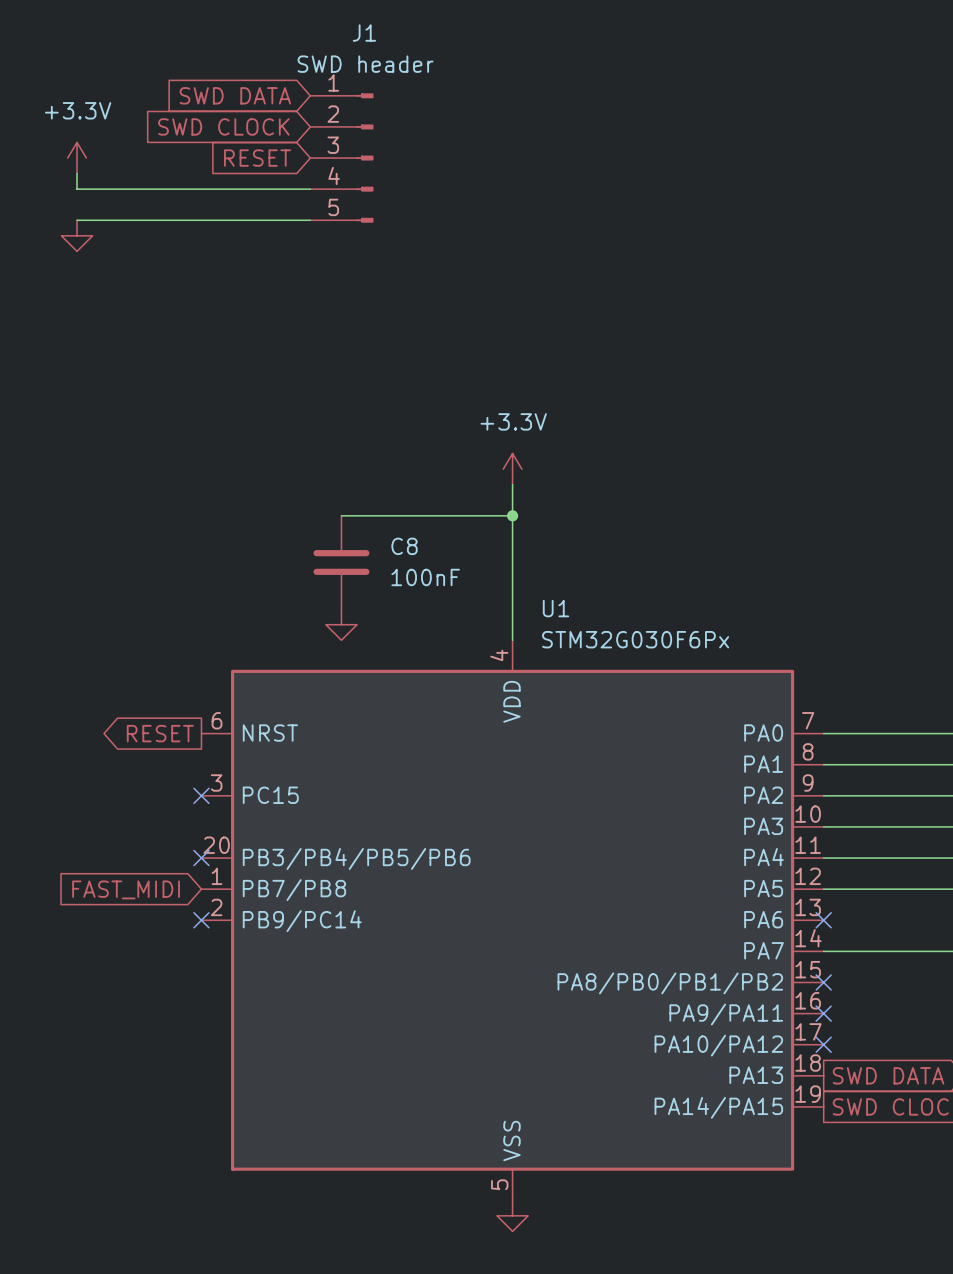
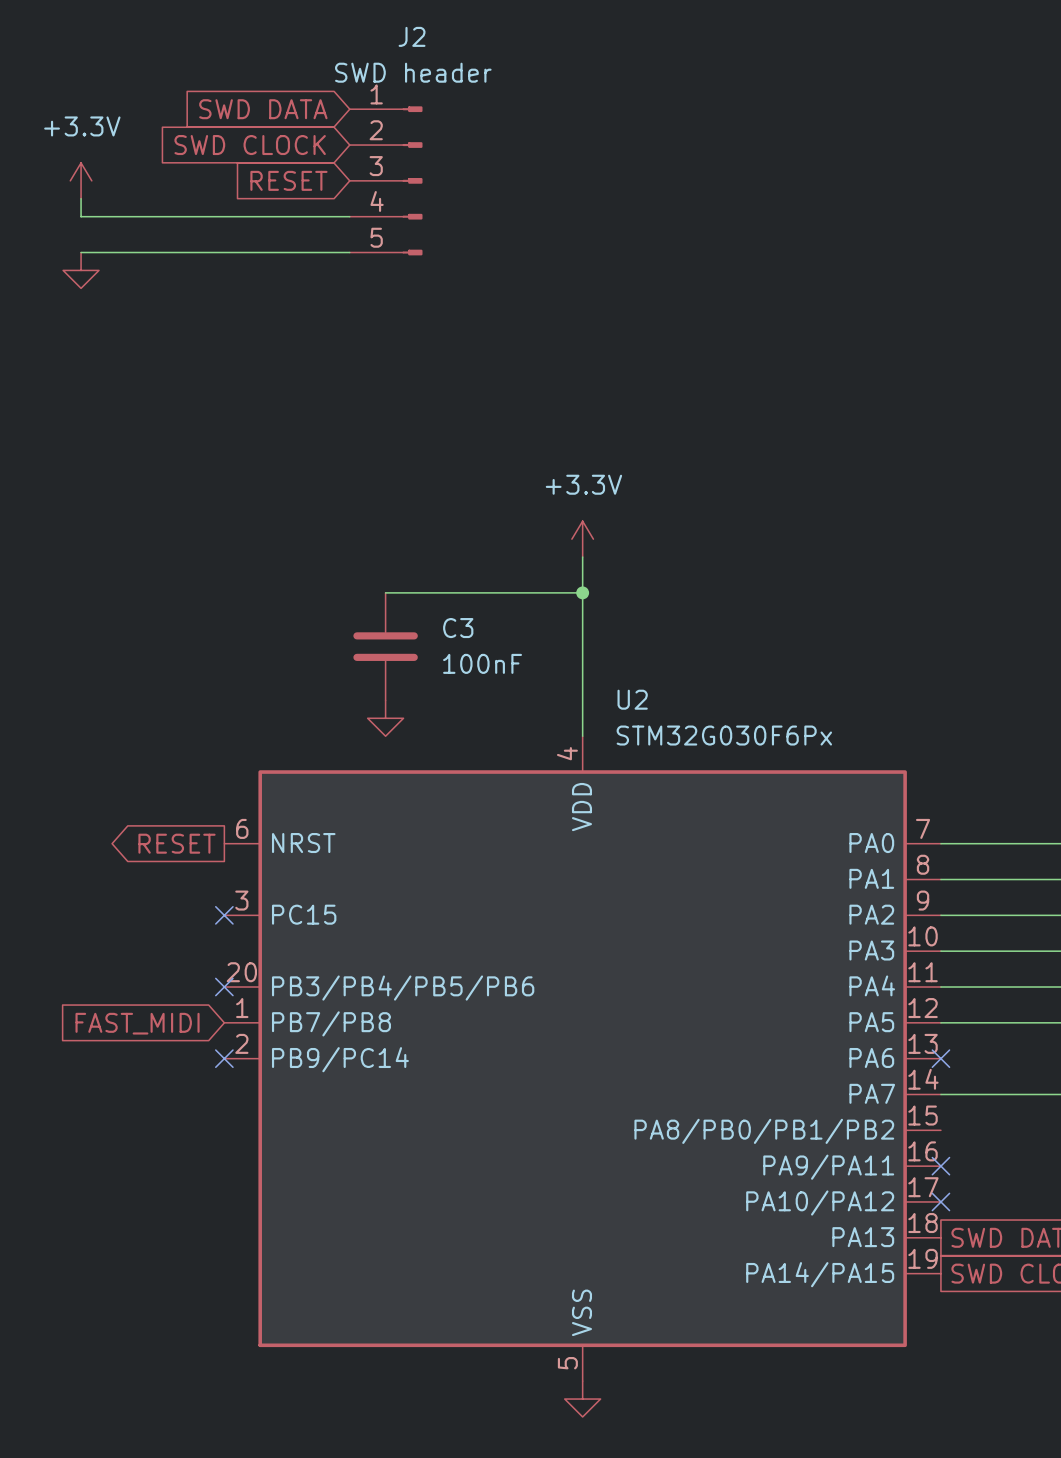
J1 name: J1 (364, 33) -> J2 (412, 36)
C8 name: C8 (404, 546) -> C3 (458, 628)
U1 name: U1 (555, 608) -> U2 (632, 699)
no-connect mark: (823, 982) -> none

